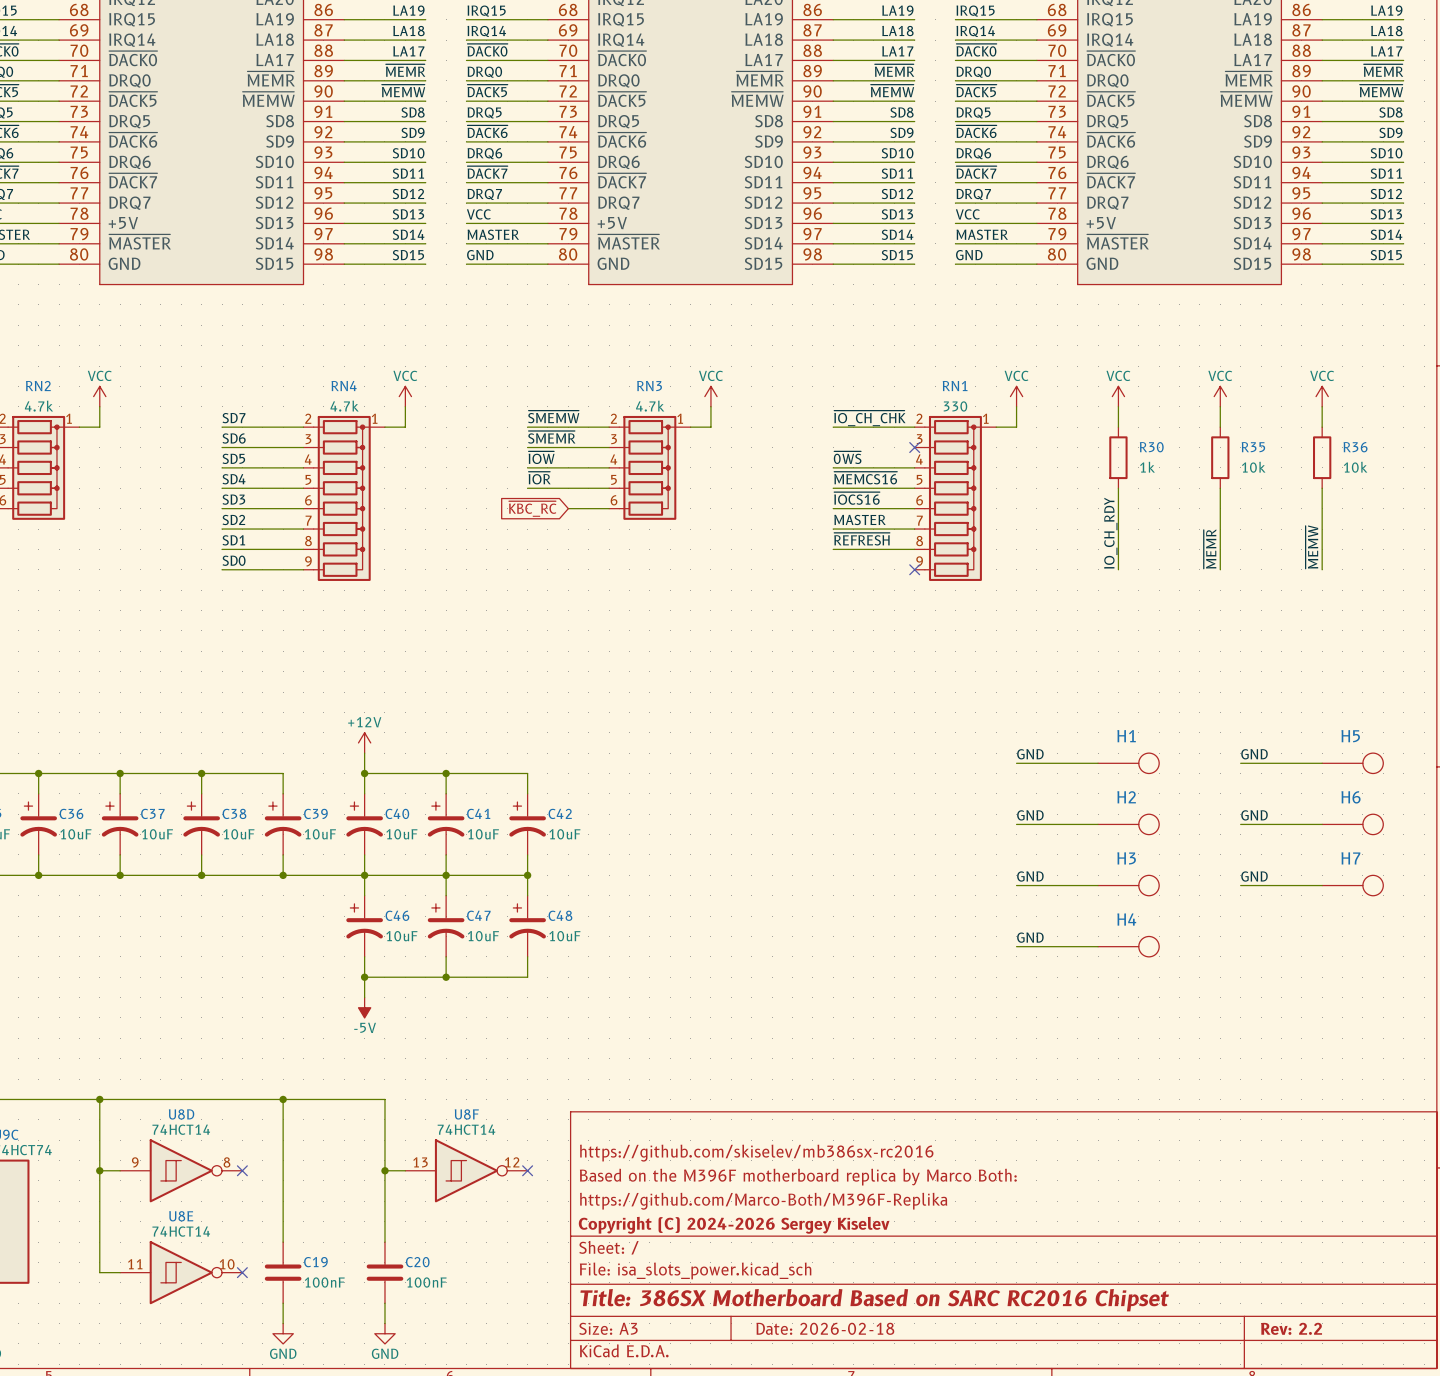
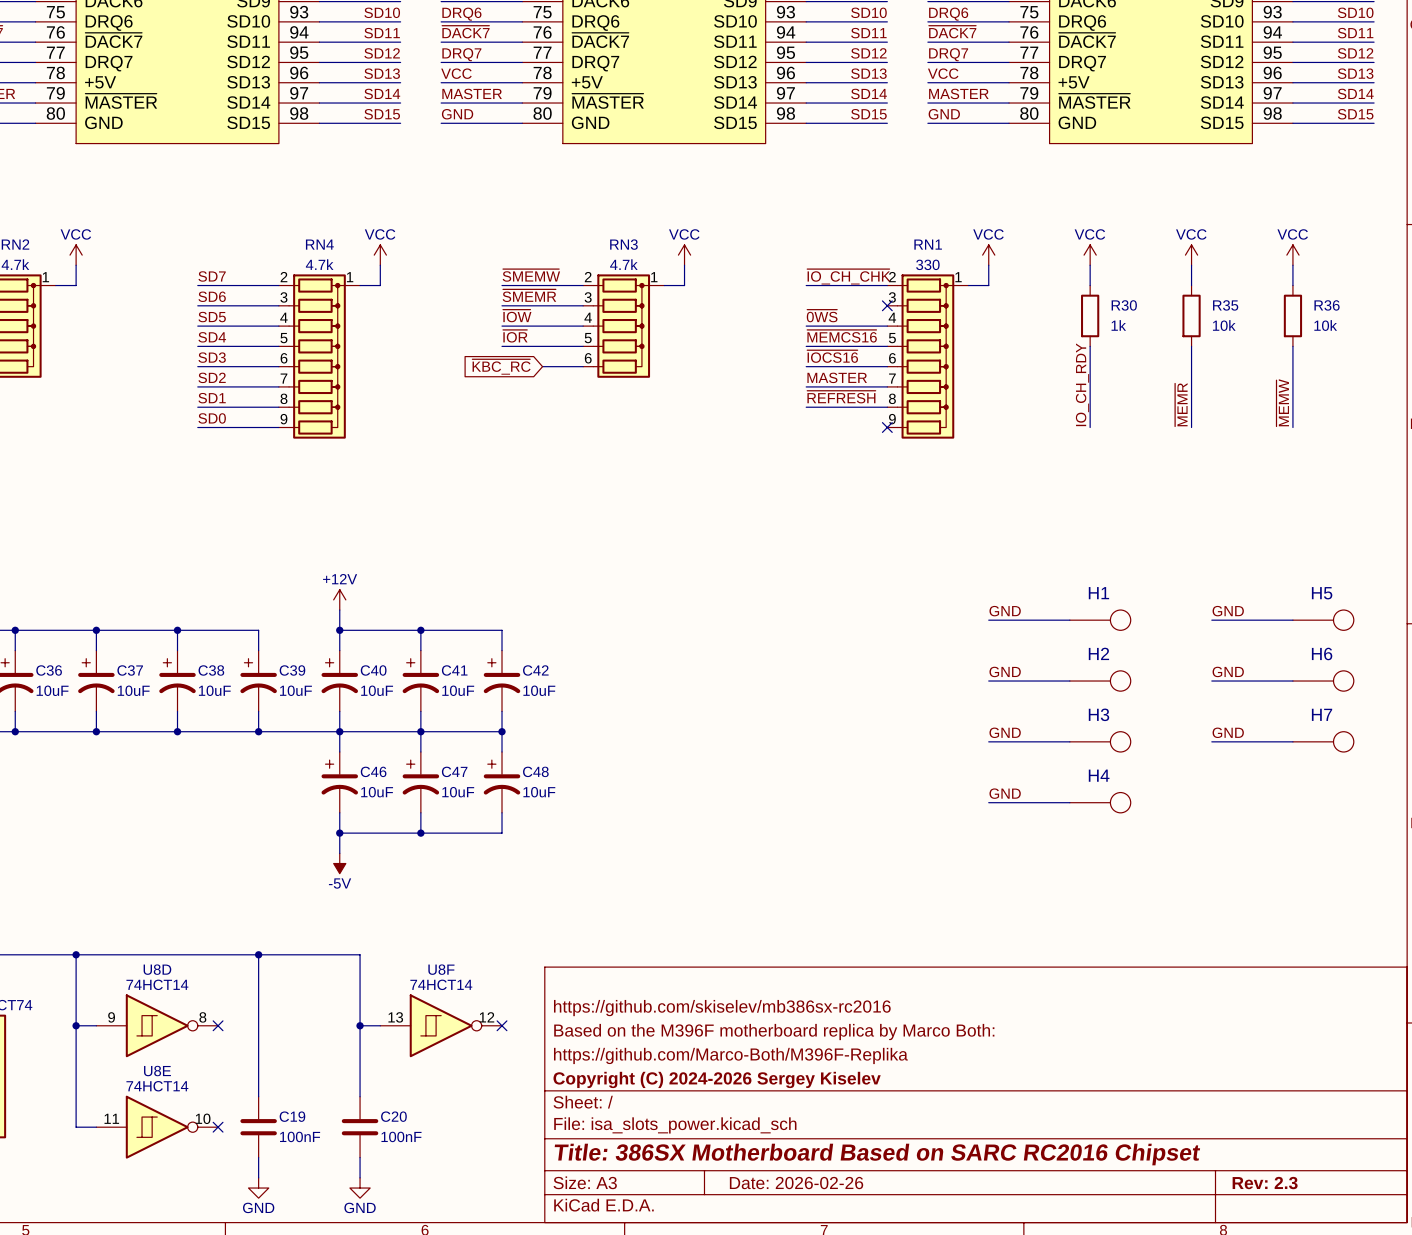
title block: Date: 2026-02-18 (825, 1328) -> Date: 2026-02-26 (796, 1183)
title block: Rev: 2.2 (1291, 1328) -> Rev: 2.3 (1265, 1183)

